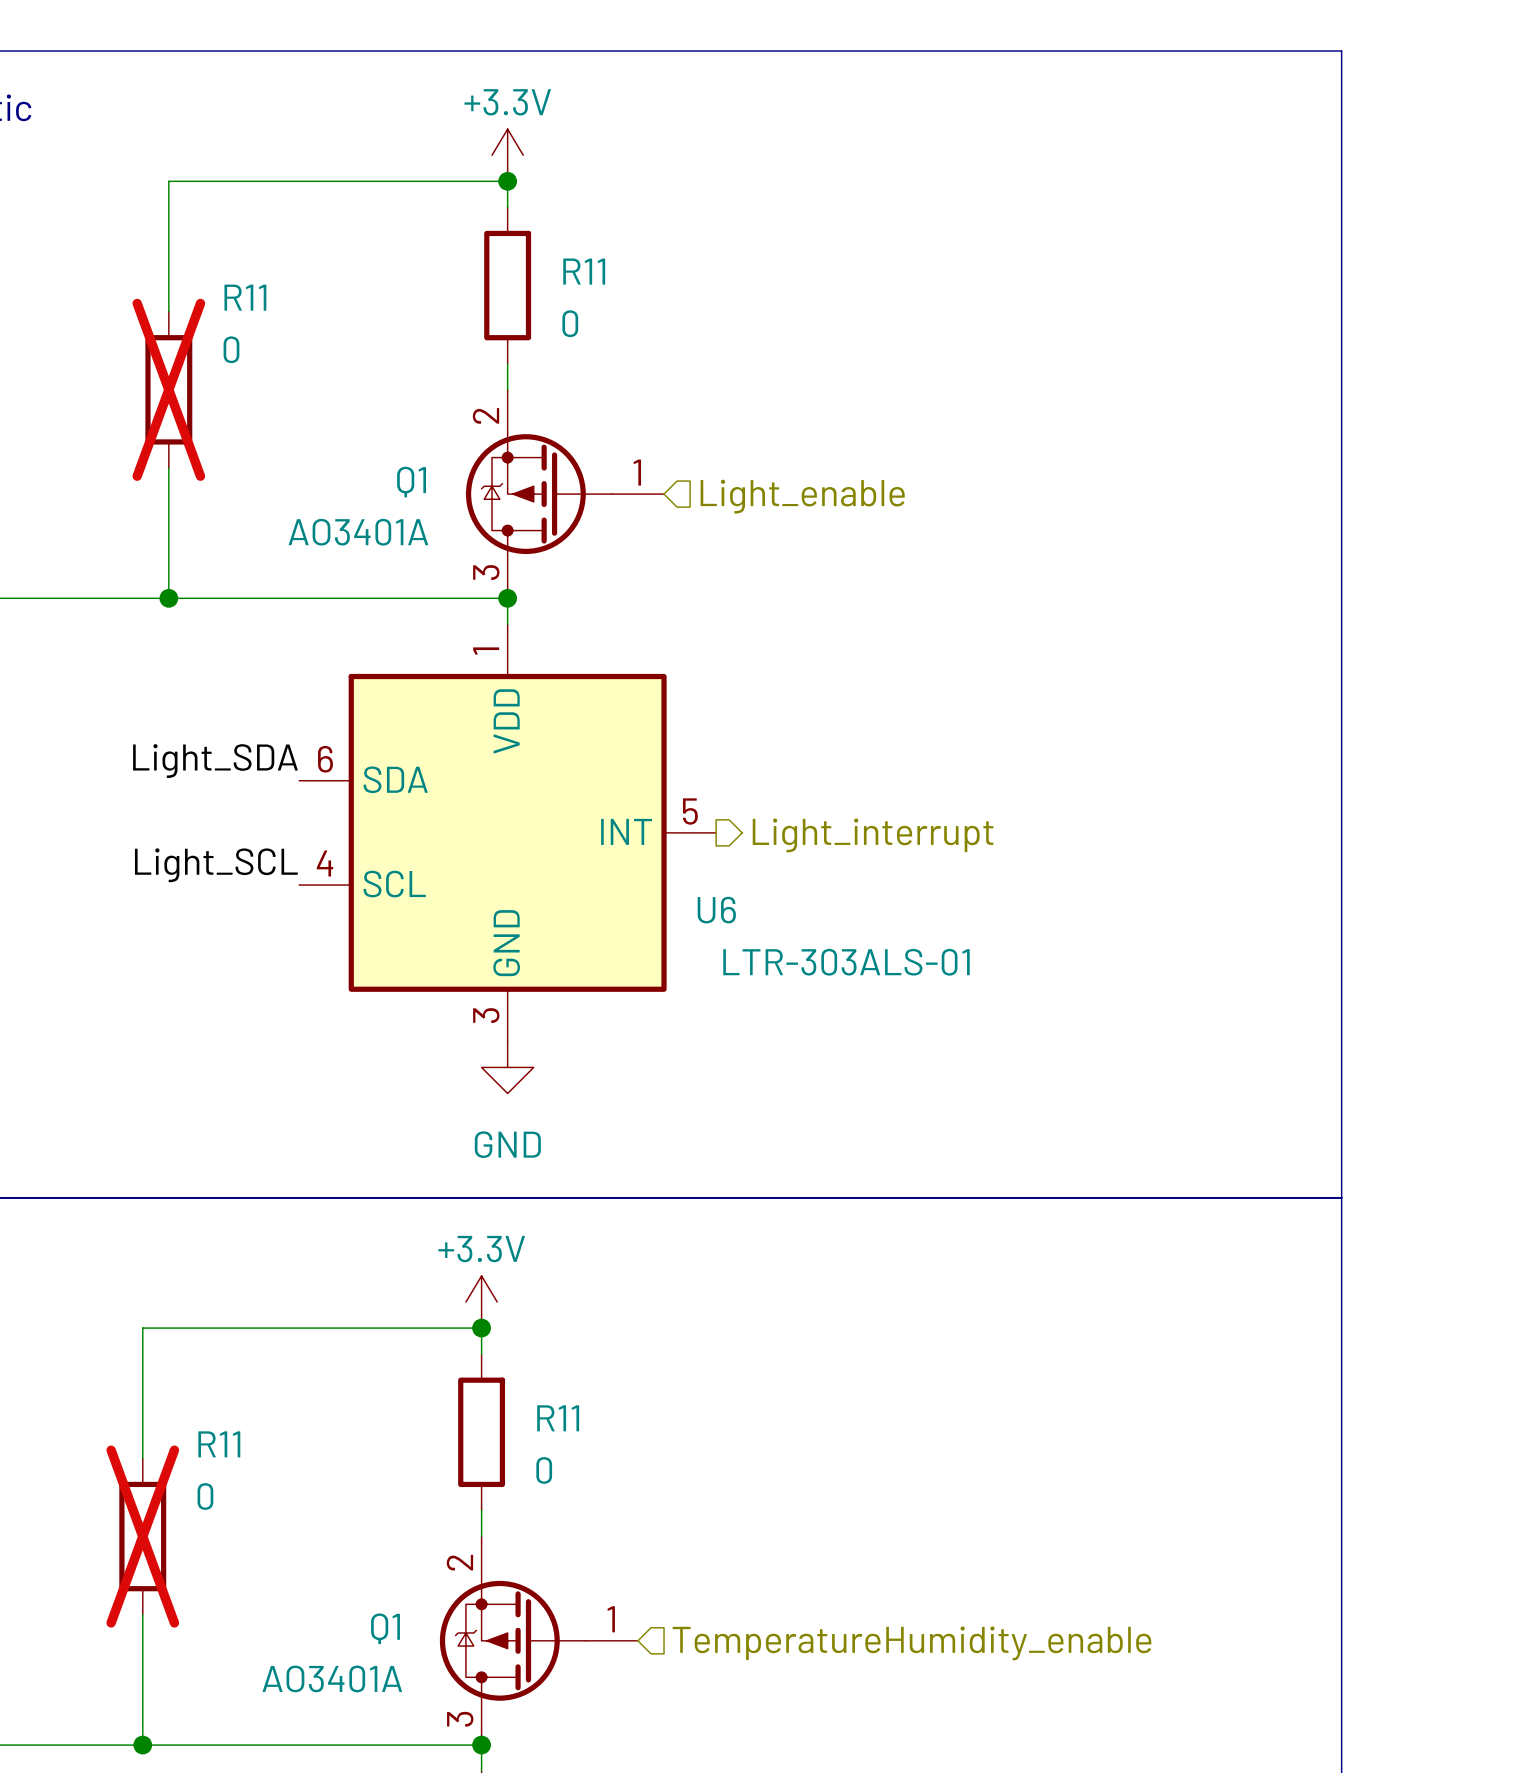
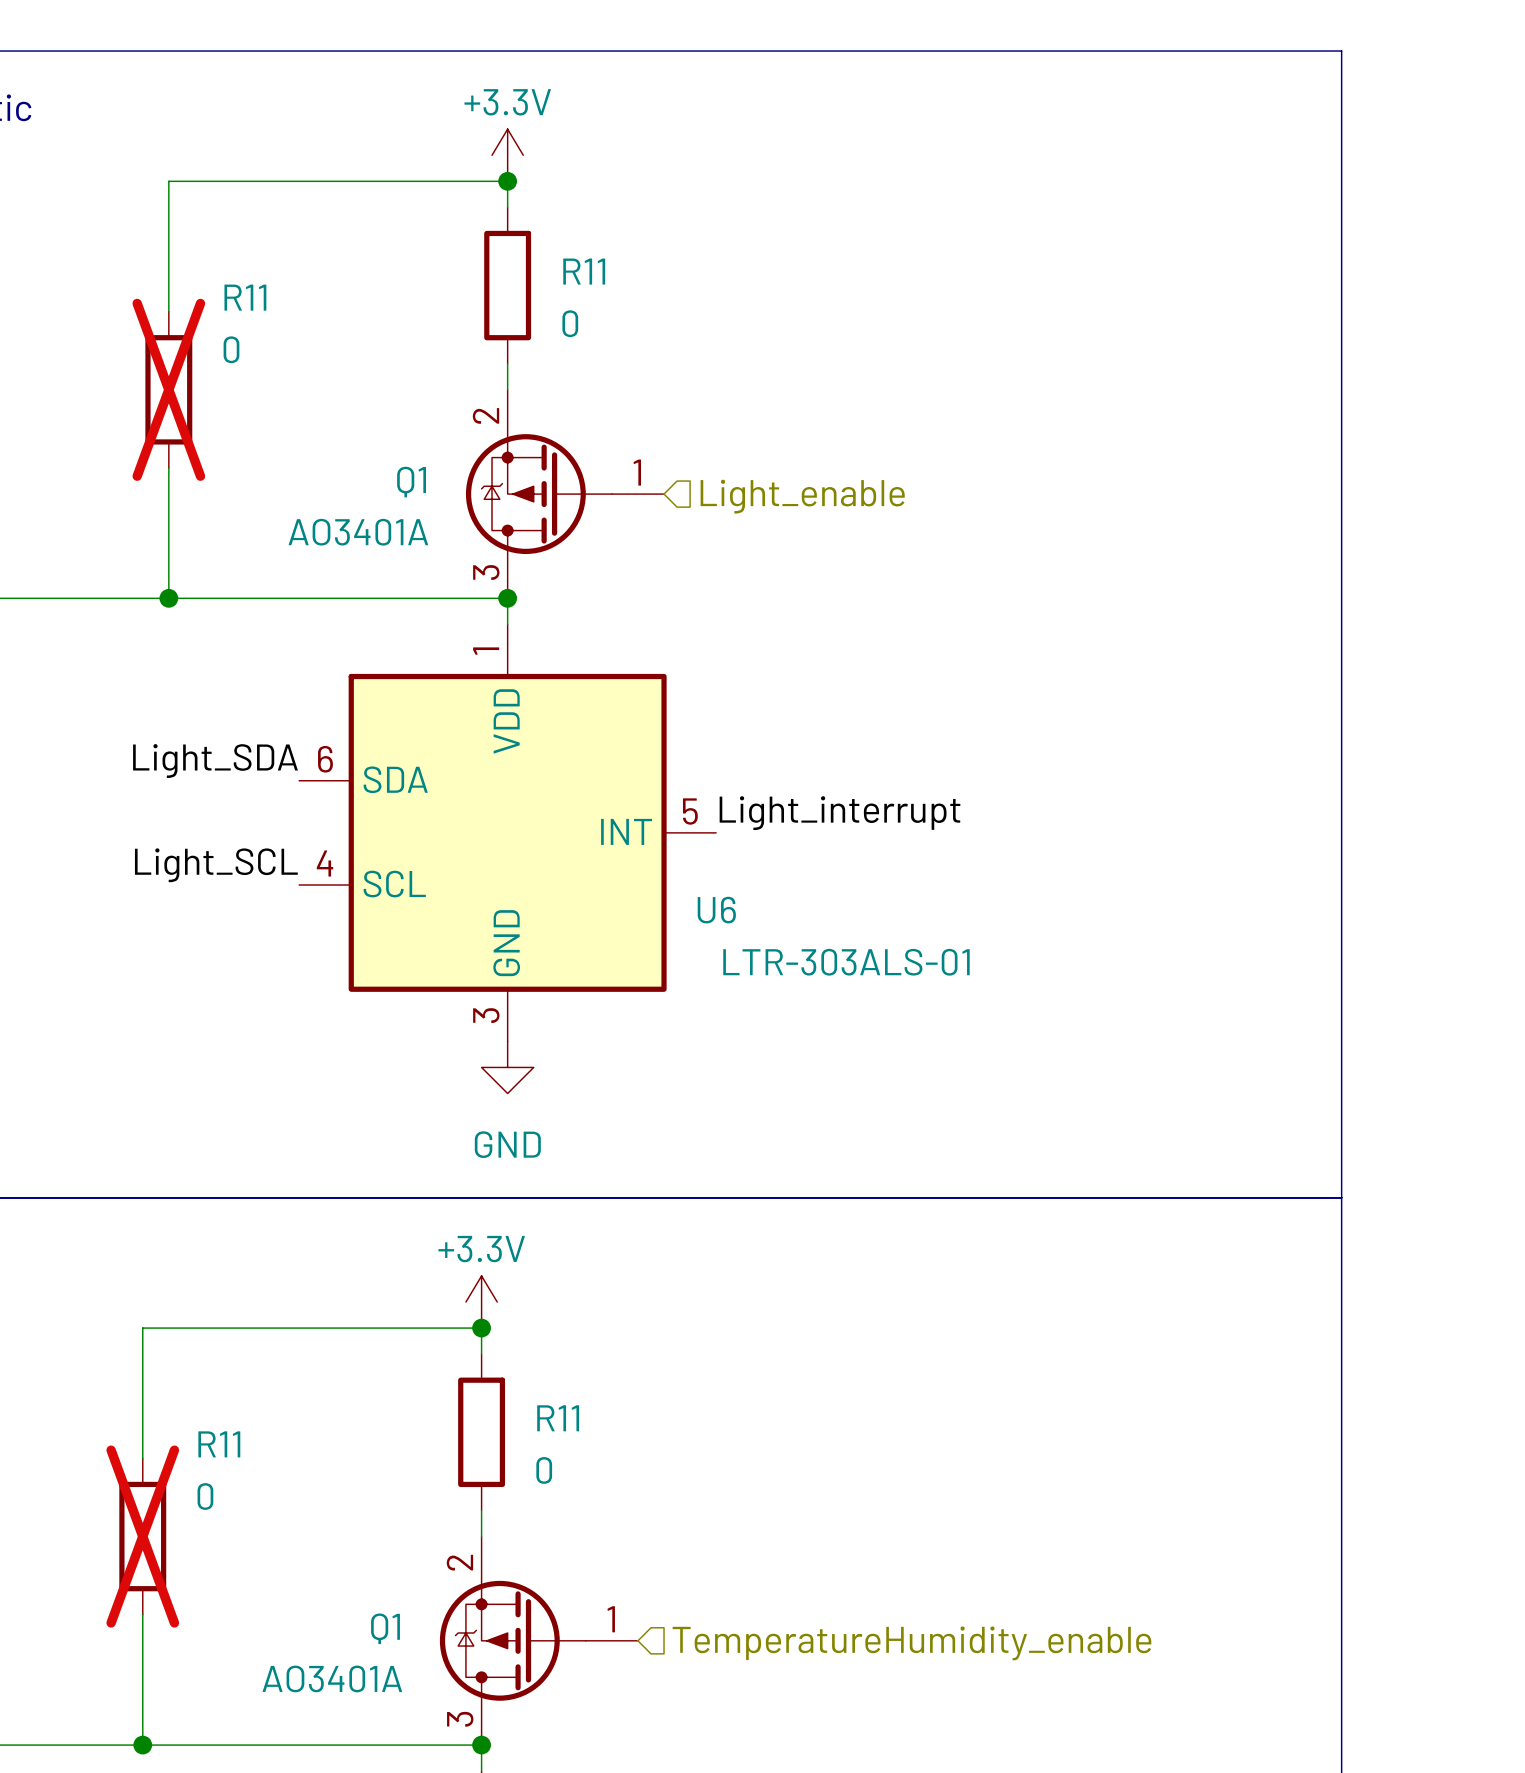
label: none -> Light_interrupt (839, 813)
hierarchical label: Light_interrupt (873, 835) -> none

